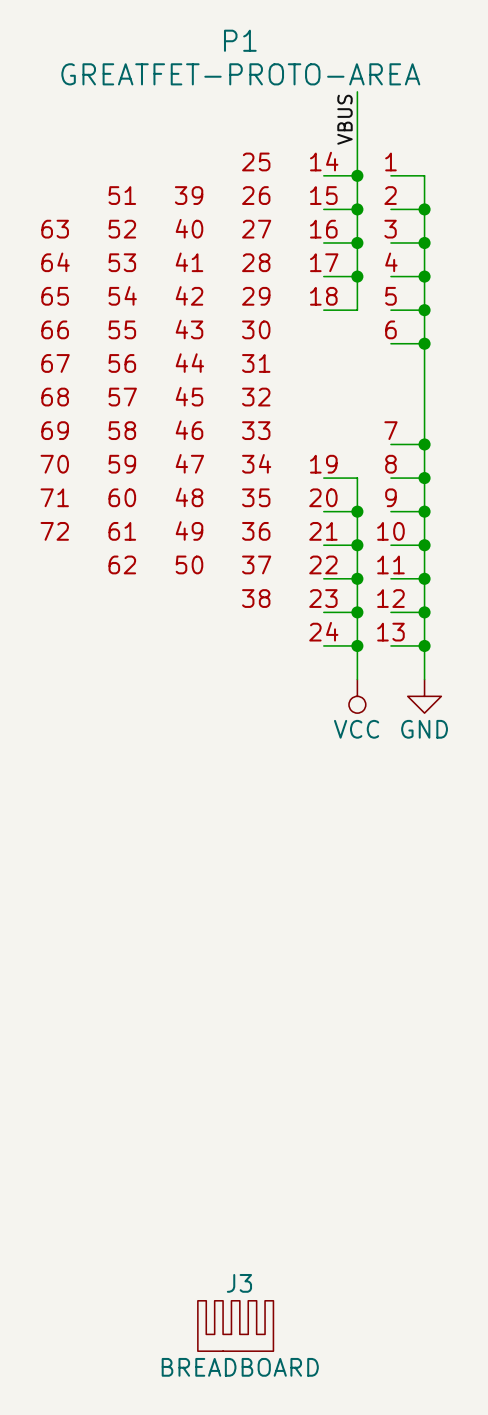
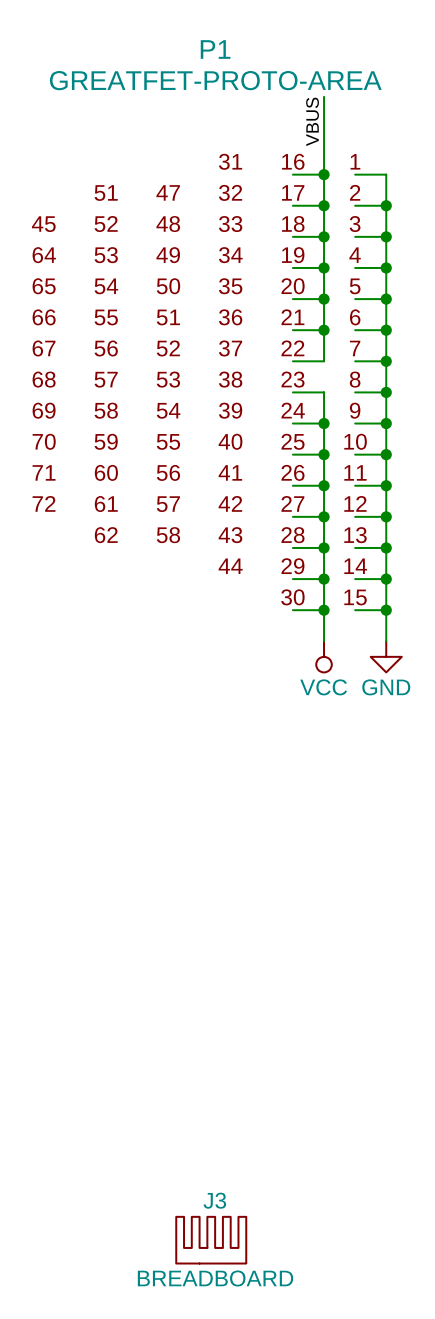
P1 symbol: [40, 29, 421, 642] -> [31, 40, 382, 606]
wire: none -> (324, 299) (324, 361) (292, 361)
junction: none -> (324, 299)
wire: none -> (292, 330) (324, 330)
junction: none -> (324, 330)
wire: none -> (355, 361) (386, 361)
junction: none -> (386, 361)
wire: none -> (292, 392) (324, 392) (324, 454)
wire: none -> (355, 392) (386, 392)
junction: none -> (386, 392)
wire: none -> (292, 423) (324, 423)
junction: none -> (324, 423)
junction: none -> (324, 454)

